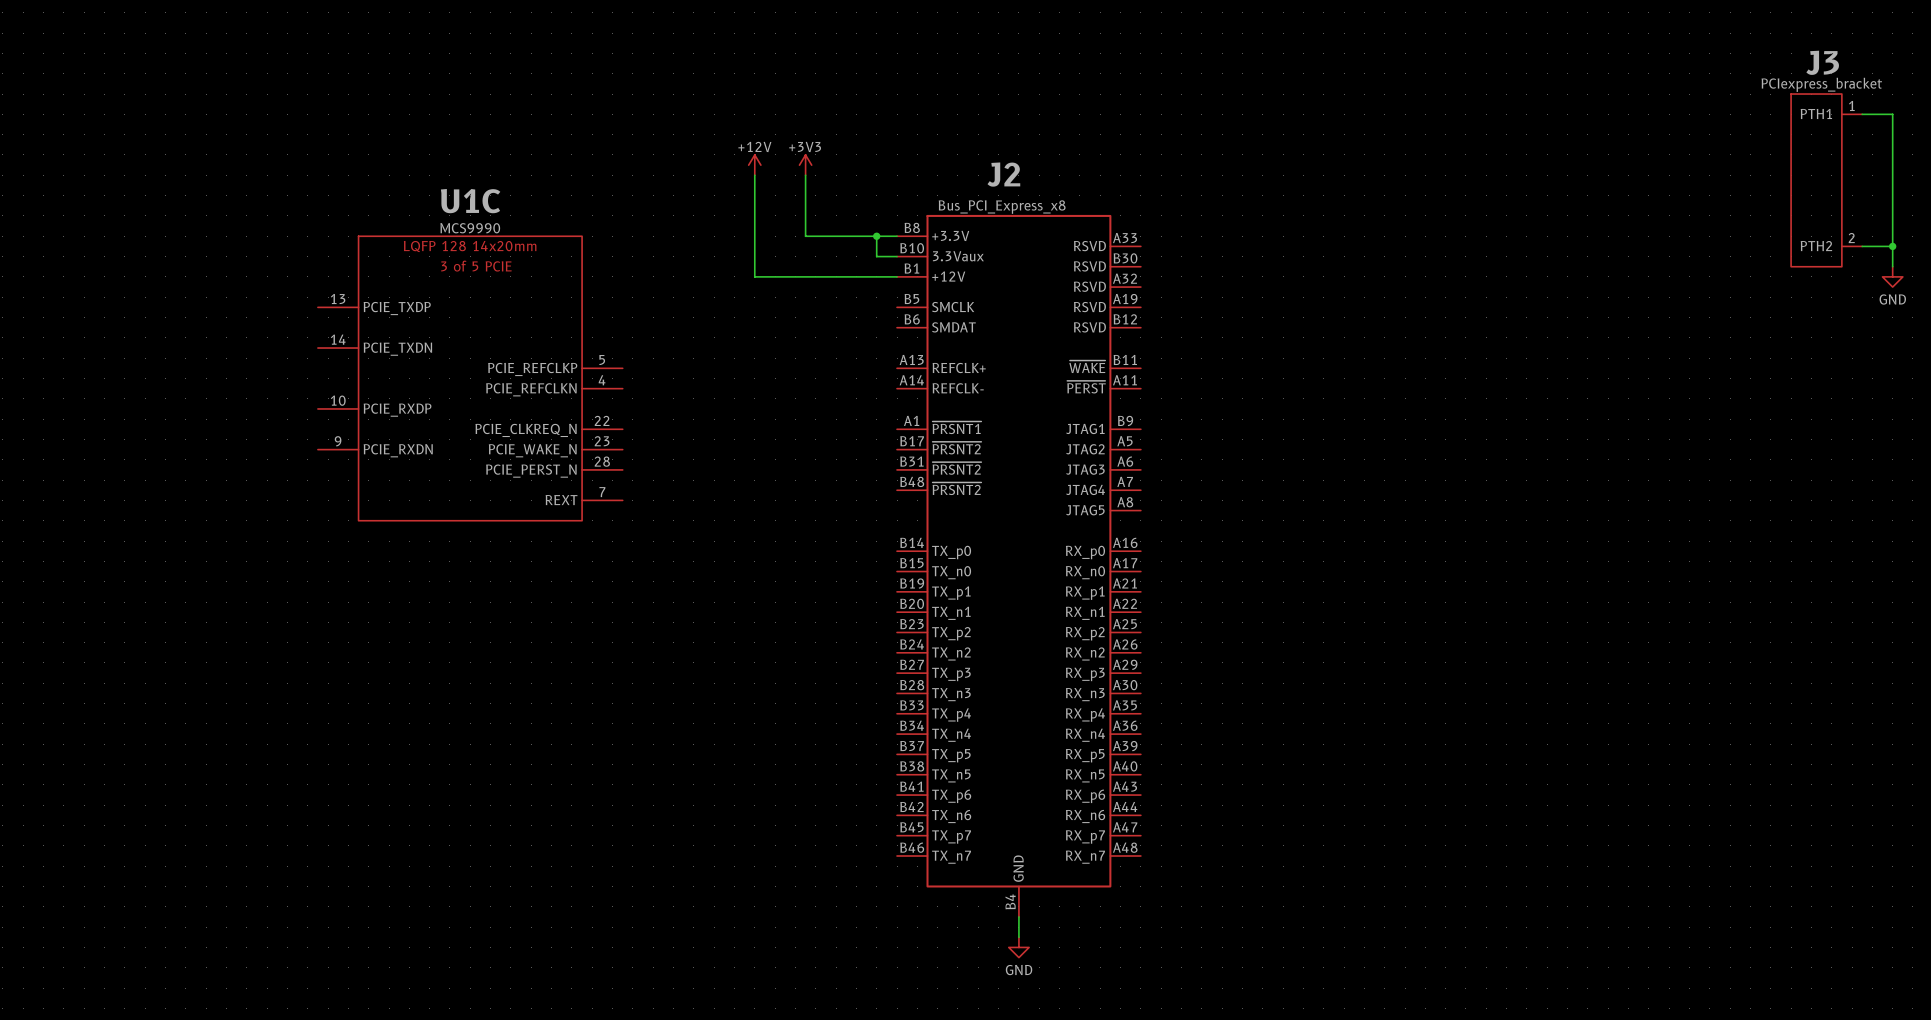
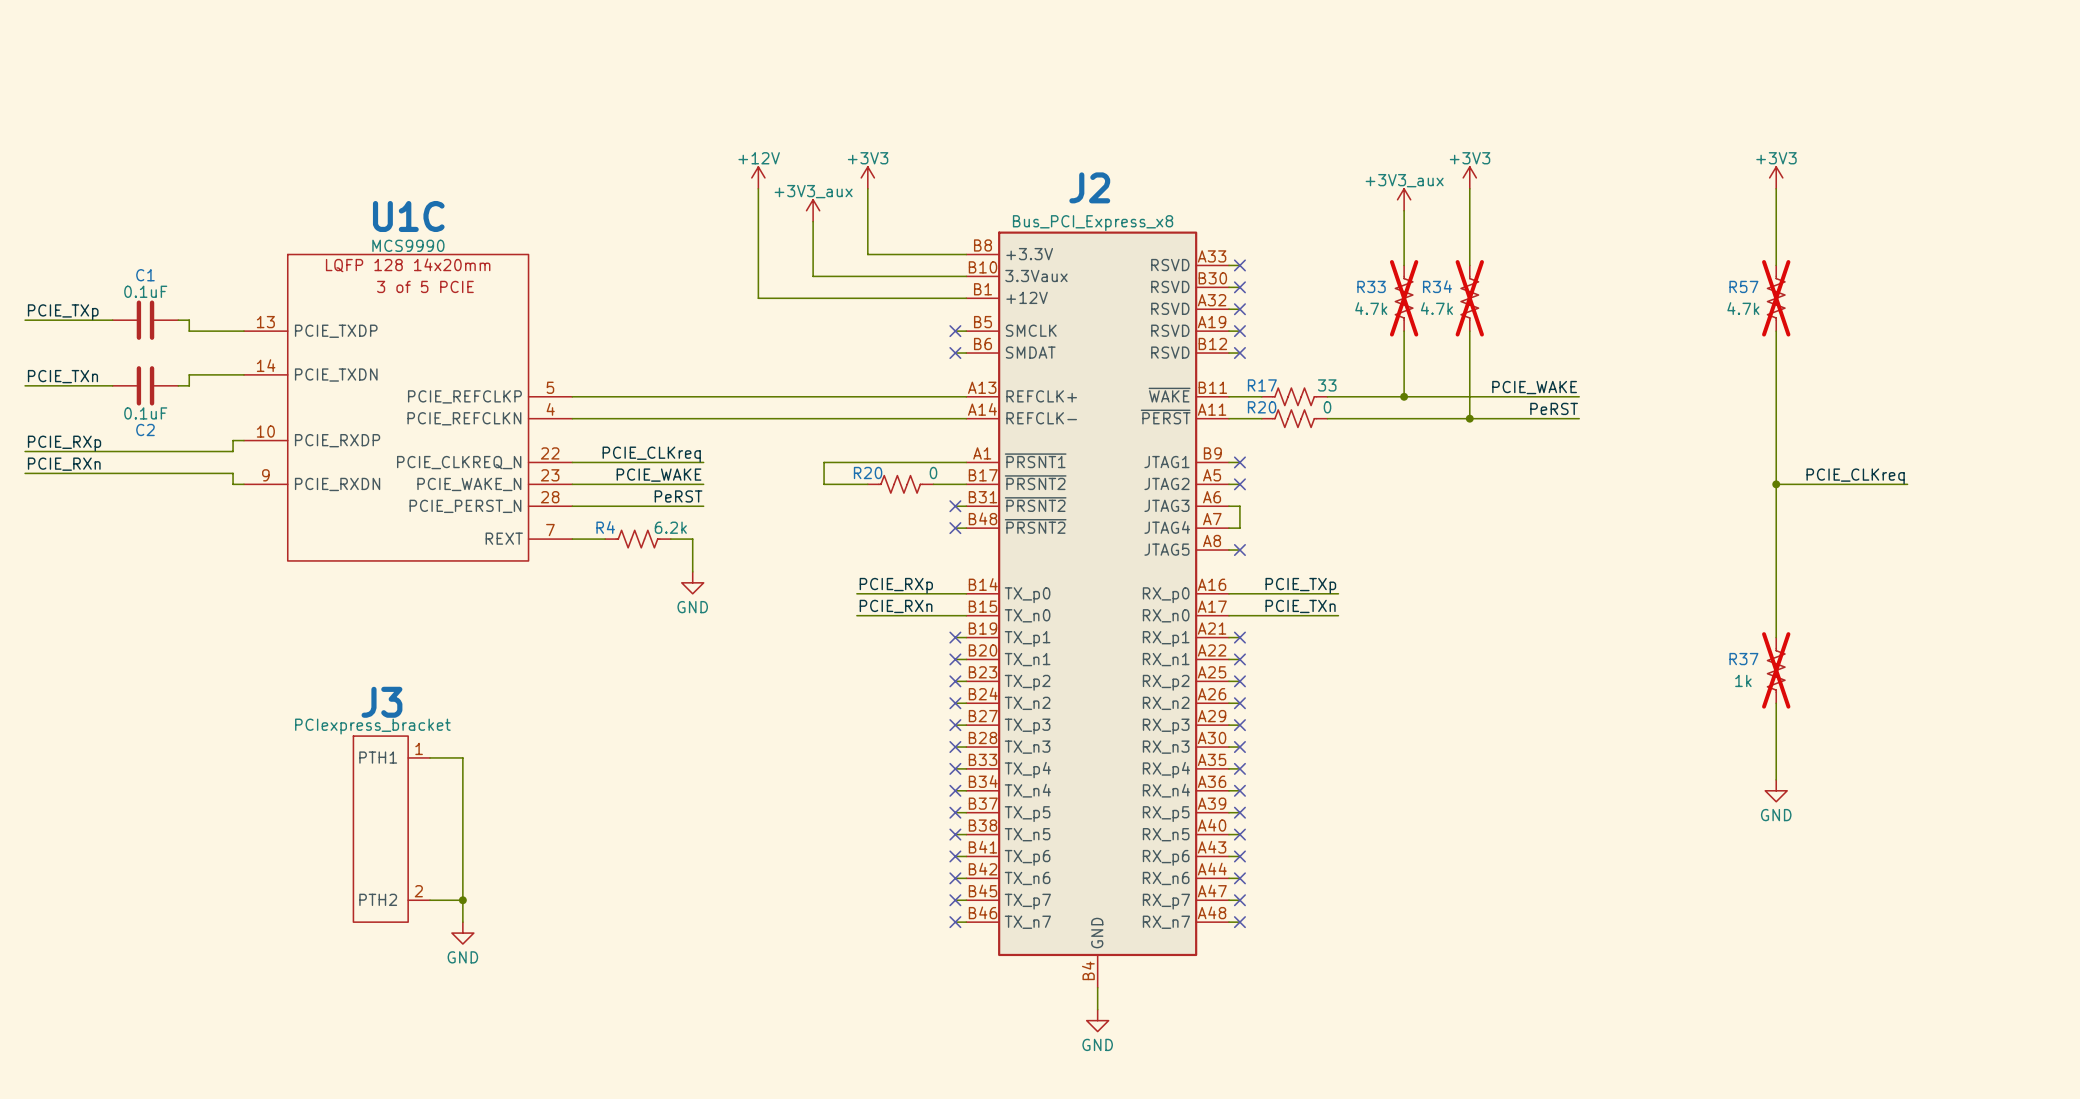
wire: (1862, 114) (1892, 114) (1892, 266) -> none
power symbol position: +12V (754, 165) -> +12V (758, 177)
power symbol: none -> +3V3 (1469, 177)
power symbol: none -> +3V3 (1776, 177)
wire: none -> (1469, 188) (1469, 265)
wire: none -> (1776, 188) (1776, 265)
J3 position: (1826, 180) -> (391, 829)
power symbol: none -> +3V3_aux (1404, 199)
power symbol: none -> +3V3_aux (813, 210)
wire: none -> (1404, 210) (1404, 265)
wire: (876, 236) (876, 256) -> (813, 276) (944, 276)
junction: (876, 236) -> none
wire: none -> (1228, 265) (1239, 265)
no-connect mark: none -> (1239, 265)
wire: (1862, 246) (1892, 246) -> none
junction: (1892, 246) -> none
wire: (754, 256) (754, 276) -> (758, 188) (758, 298) (813, 298)
wire: none -> (1228, 287) (1239, 287)
no-connect mark: none -> (1239, 287)
R33: none -> 4.7k (1404, 298)
R34: none -> 4.7k (1469, 298)
R57: none -> 4.7k (1776, 298)
power symbol: GND (1892, 276) -> none
wire: none -> (1228, 309) (1239, 309)
no-connect mark: none -> (1239, 309)
label: none -> PCIE_TXp (63, 312)
wire: none -> (25, 320) (112, 320)
C1: none -> 0.1uF (145, 320)
wire: none -> (178, 320) (189, 320) (189, 331) (243, 331)
wire: none -> (955, 331) (966, 331)
no-connect mark: none -> (955, 331)
wire: none -> (1228, 331) (1239, 331)
no-connect mark: none -> (1239, 331)
wire: none -> (1404, 331) (1404, 396)
wire: none -> (1469, 331) (1469, 418)
wire: none -> (1776, 331) (1776, 637)
wire: none -> (955, 353) (966, 353)
no-connect mark: none -> (955, 353)
wire: none -> (1228, 353) (1239, 353)
no-connect mark: none -> (1239, 353)
wire: none -> (243, 374) (189, 374) (189, 385) (178, 385)
label: none -> PCIE_TXn (62, 376)
wire: none -> (25, 385) (112, 385)
C2: none -> 0.1uF (145, 385)
label: none -> PCIE_WAKE (1534, 387)
wire: none -> (572, 396) (966, 396)
wire: none -> (1228, 396) (1261, 396)
R17: none -> 33 (1294, 396)
wire: none -> (1327, 396) (1579, 396)
junction: none -> (1404, 396)
U1C position: (470, 378) -> (408, 407)
label: none -> PeRST (1554, 408)
wire: none -> (572, 418) (966, 418)
wire: none -> (1228, 418) (1261, 418)
R20: none -> 0 (1294, 418)
wire: none -> (1327, 418) (1579, 418)
junction: none -> (1469, 418)
wire: none -> (243, 440) (233, 440) (233, 451) (25, 451)
label: none -> PCIE_RXp (64, 443)
label: none -> PCIE_CLKreq (651, 454)
wire: none -> (572, 462) (703, 462)
wire: none -> (966, 462) (824, 462) (824, 484) (867, 484)
wire: none -> (1228, 462) (1239, 462)
no-connect mark: none -> (1239, 462)
label: none -> PCIE_RXn (64, 464)
wire: none -> (25, 473) (233, 473) (233, 484) (243, 484)
label: none -> PCIE_WAKE (659, 475)
label: none -> PCIE_CLKreq (1855, 476)
wire: none -> (572, 484) (703, 484)
R20: none -> 0 (900, 484)
wire: none -> (933, 484) (966, 484)
wire: none -> (1228, 484) (1239, 484)
no-connect mark: none -> (1239, 484)
wire: none -> (1776, 484) (1907, 484)
junction: none -> (1776, 484)
label: none -> PeRST (678, 496)
wire: none -> (572, 506) (703, 506)
wire: none -> (955, 506) (966, 506)
no-connect mark: none -> (955, 506)
wire: none -> (1228, 506) (1239, 506) (1239, 528) (1228, 528)
wire: none -> (955, 528) (966, 528)
no-connect mark: none -> (955, 528)
wire: none -> (572, 539) (605, 539)
R4: none -> 6.2k (637, 539)
wire: none -> (670, 539) (692, 539) (692, 571)
wire: none -> (1228, 550) (1239, 550)
no-connect mark: none -> (1239, 550)
power symbol: none -> GND (692, 582)
label: none -> PCIE_RXp (896, 585)
label: none -> PCIE_TXp (1300, 585)
wire: none -> (856, 593) (966, 593)
wire: none -> (1228, 593) (1338, 593)
label: none -> PCIE_RXn (896, 606)
label: none -> PCIE_TXn (1300, 606)
wire: none -> (856, 615) (966, 615)
wire: none -> (1228, 615) (1338, 615)
wire: none -> (955, 637) (966, 637)
no-connect mark: none -> (955, 637)
wire: none -> (1228, 637) (1239, 637)
no-connect mark: none -> (1239, 637)
wire: none -> (955, 659) (966, 659)
no-connect mark: none -> (955, 659)
wire: none -> (1228, 659) (1239, 659)
no-connect mark: none -> (1239, 659)
R37: none -> 1k (1776, 670)
wire: none -> (955, 681) (966, 681)
no-connect mark: none -> (955, 681)
wire: none -> (1228, 681) (1239, 681)
no-connect mark: none -> (1239, 681)
wire: none -> (955, 703) (966, 703)
no-connect mark: none -> (955, 703)
wire: none -> (1228, 703) (1239, 703)
no-connect mark: none -> (1239, 703)
wire: none -> (1776, 703) (1776, 779)
wire: none -> (955, 725) (966, 725)
no-connect mark: none -> (955, 725)
wire: none -> (1228, 725) (1239, 725)
no-connect mark: none -> (1239, 725)
wire: none -> (955, 747) (966, 747)
no-connect mark: none -> (955, 747)
wire: none -> (1228, 747) (1239, 747)
no-connect mark: none -> (1239, 747)
wire: none -> (430, 757) (462, 757) (462, 922)
wire: none -> (955, 768) (966, 768)
no-connect mark: none -> (955, 768)
wire: none -> (1228, 768) (1239, 768)
no-connect mark: none -> (1239, 768)
wire: none -> (955, 790) (966, 790)
no-connect mark: none -> (955, 790)
wire: none -> (1228, 790) (1239, 790)
no-connect mark: none -> (1239, 790)
power symbol: none -> GND (1776, 790)
wire: none -> (955, 812) (966, 812)
no-connect mark: none -> (955, 812)
wire: none -> (1228, 812) (1239, 812)
no-connect mark: none -> (1239, 812)
wire: none -> (955, 834) (966, 834)
no-connect mark: none -> (955, 834)
wire: none -> (1228, 834) (1239, 834)
no-connect mark: none -> (1239, 834)
wire: none -> (955, 856) (966, 856)
no-connect mark: none -> (955, 856)
wire: none -> (1228, 856) (1239, 856)
no-connect mark: none -> (1239, 856)
wire: none -> (955, 878) (966, 878)
no-connect mark: none -> (955, 878)
wire: none -> (1228, 878) (1239, 878)
no-connect mark: none -> (1239, 878)
wire: none -> (430, 900) (462, 900)
junction: none -> (462, 900)
wire: none -> (955, 900) (966, 900)
no-connect mark: none -> (955, 900)
wire: none -> (1228, 900) (1239, 900)
no-connect mark: none -> (1239, 900)
wire: none -> (955, 922) (966, 922)
no-connect mark: none -> (955, 922)
wire: none -> (1228, 922) (1239, 922)
no-connect mark: none -> (1239, 922)
power symbol: none -> GND (462, 933)

